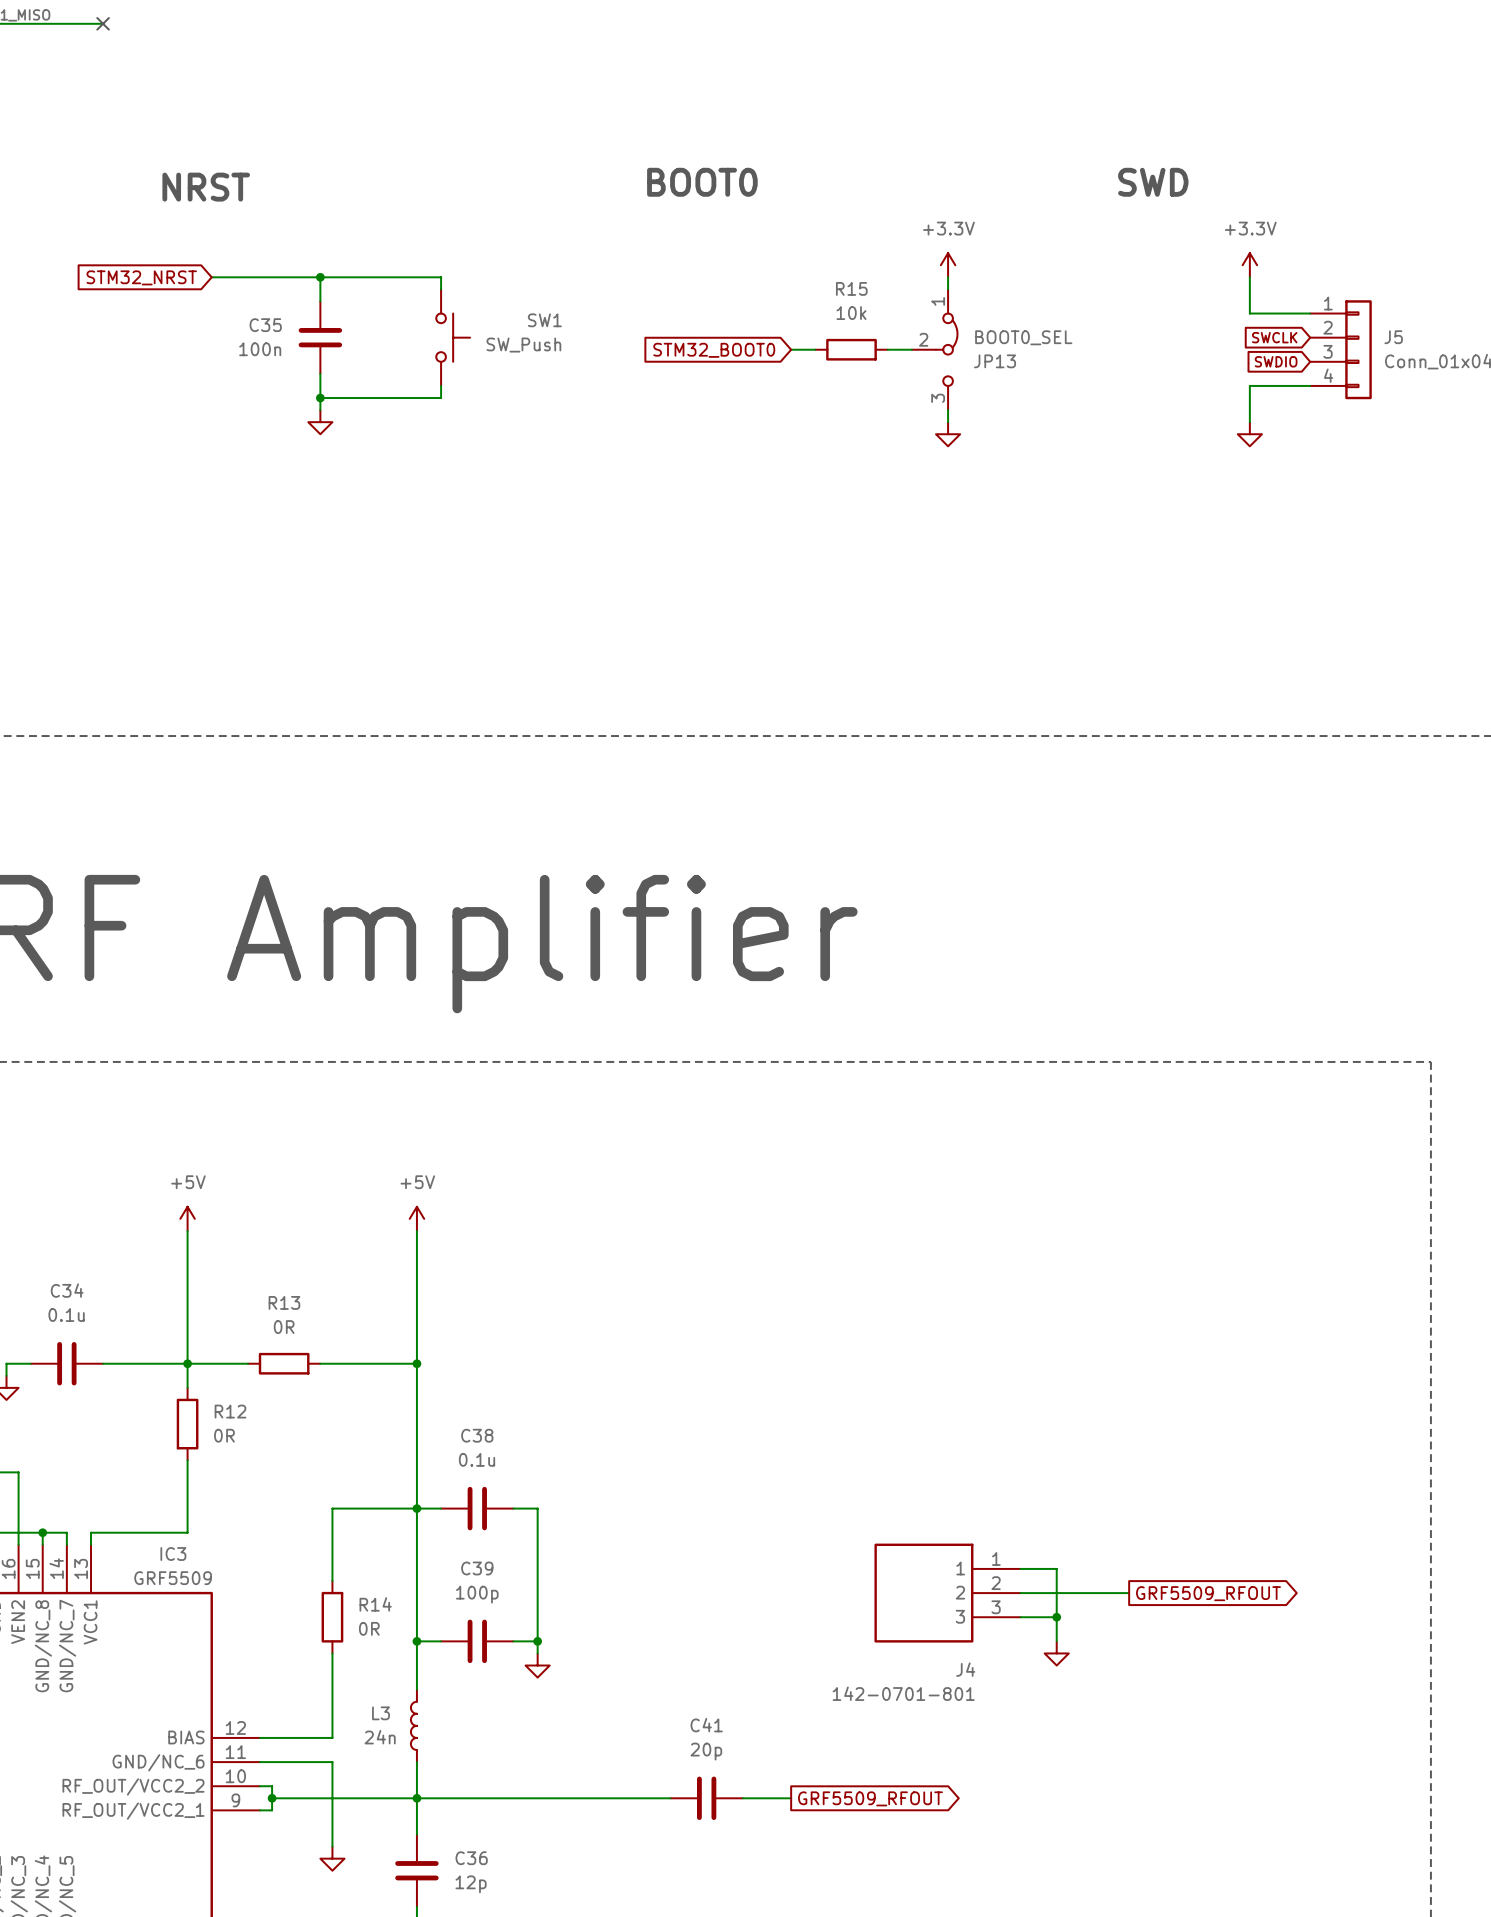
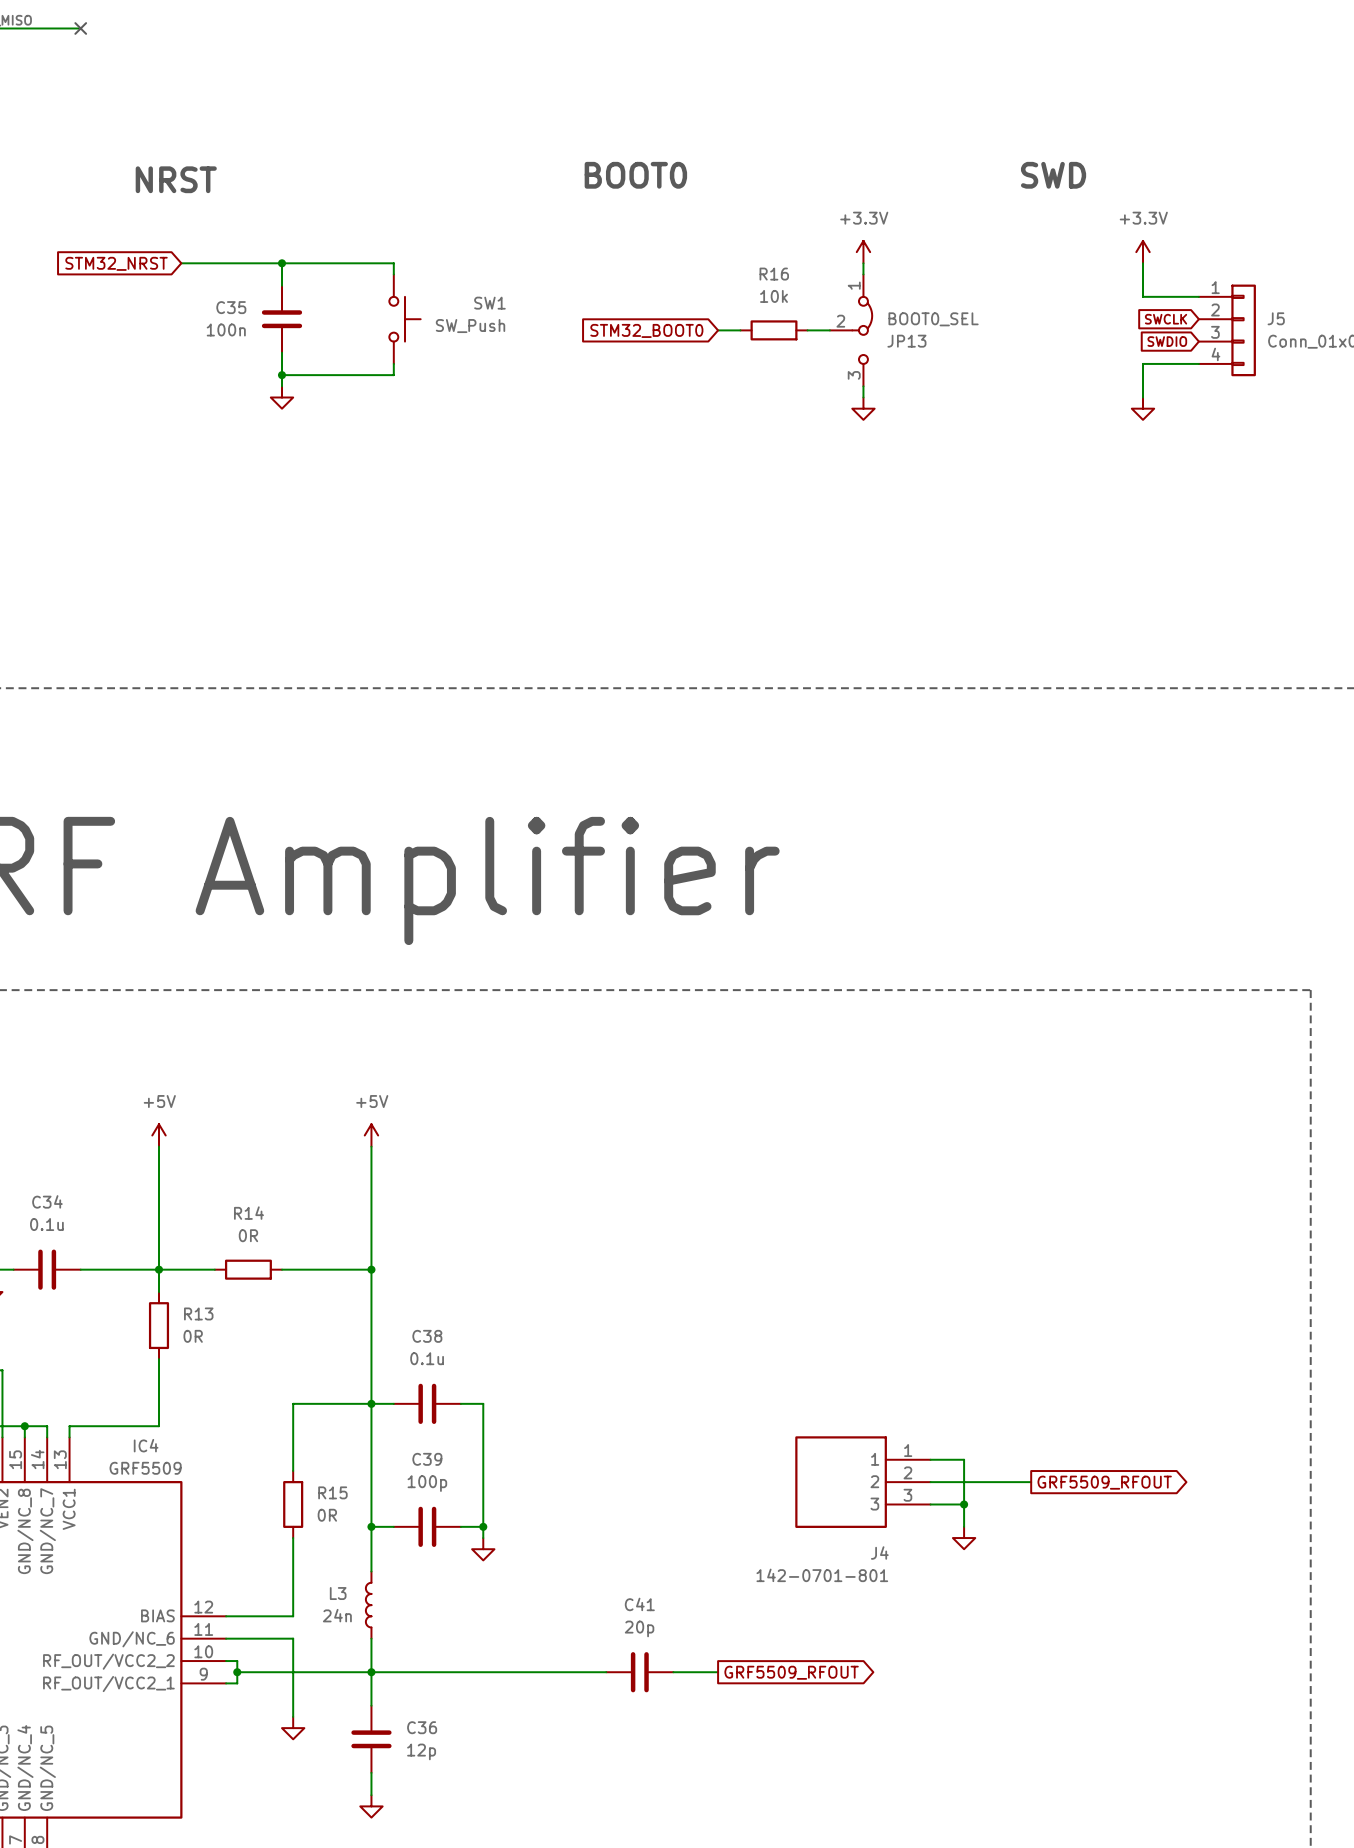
R15 name: R15 (851, 288) -> R16 (774, 274)
R13 name: R13 (284, 1302) -> R14 (248, 1213)
R12 name: R12 (230, 1411) -> R13 (198, 1313)
IC3 name: IC3 (173, 1554) -> IC4 (146, 1445)
R14 name: R14 (375, 1604) -> R15 (332, 1492)

